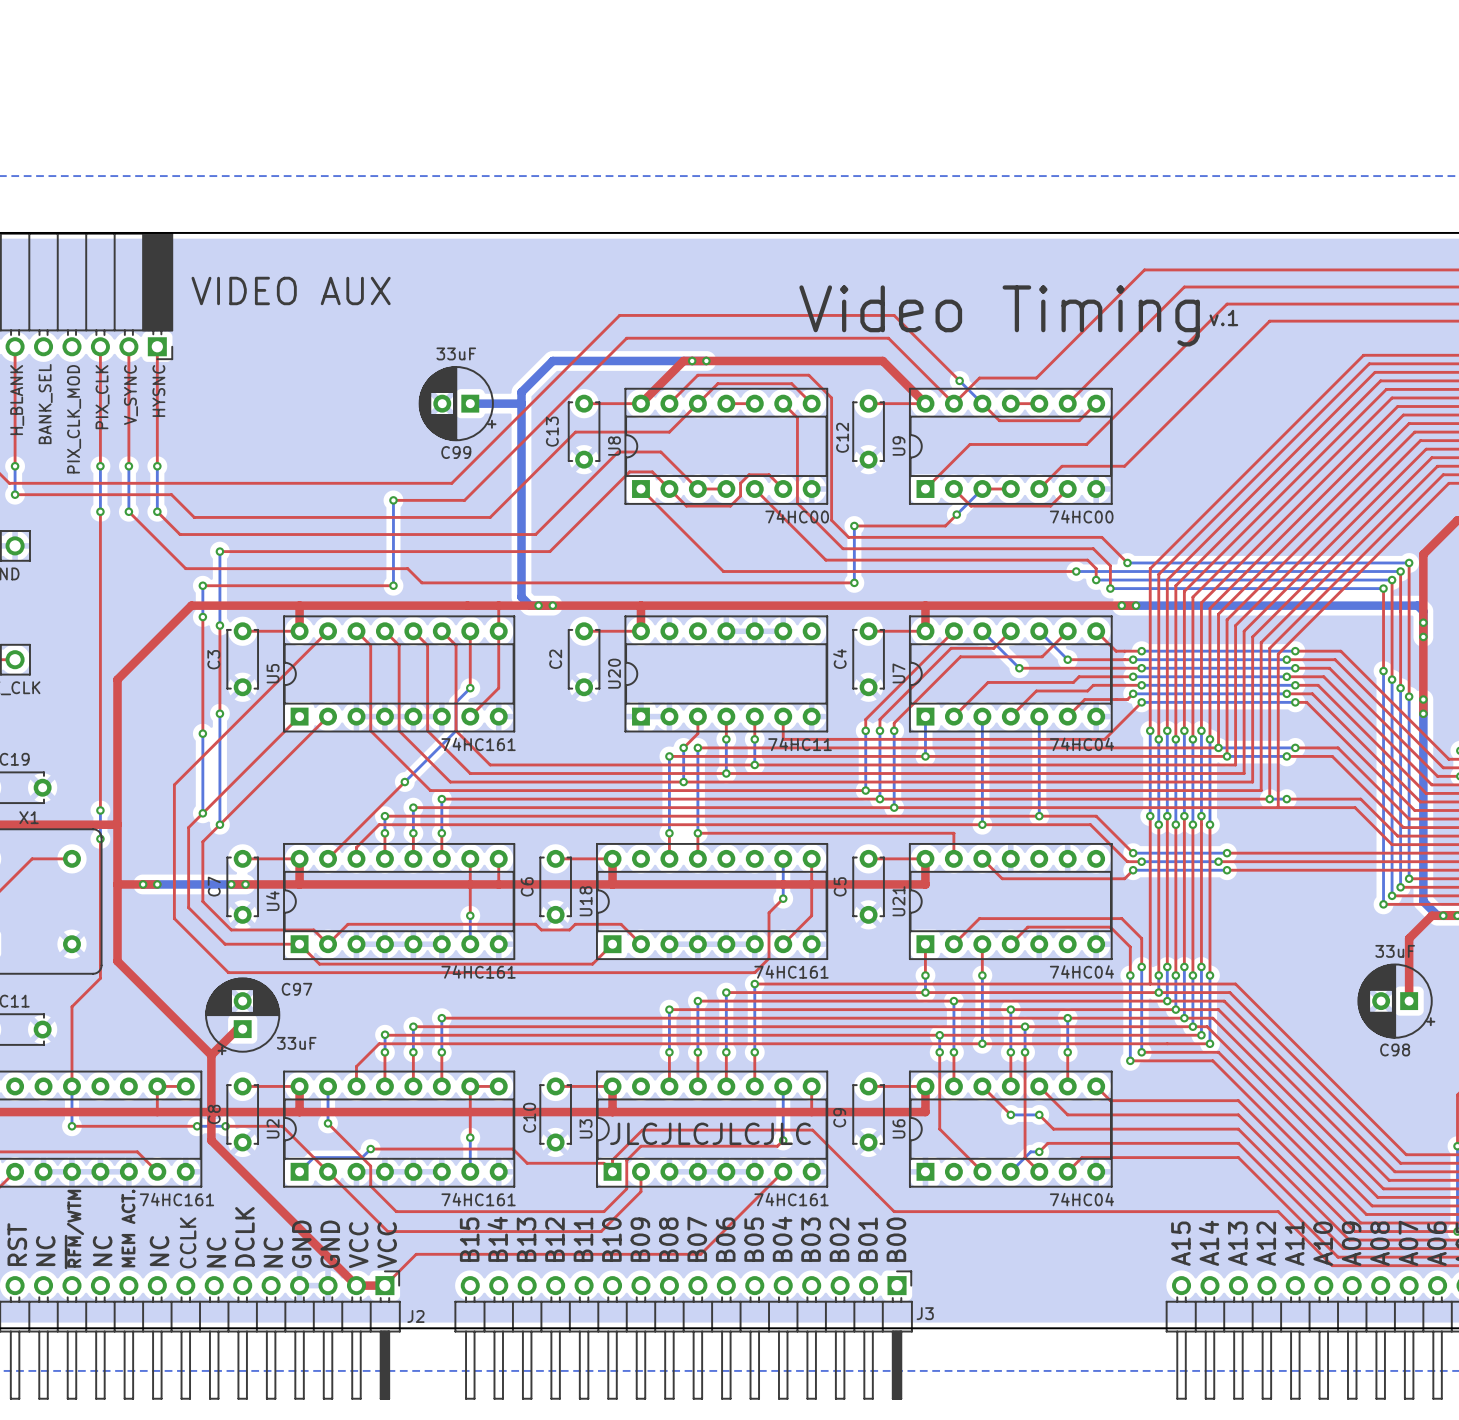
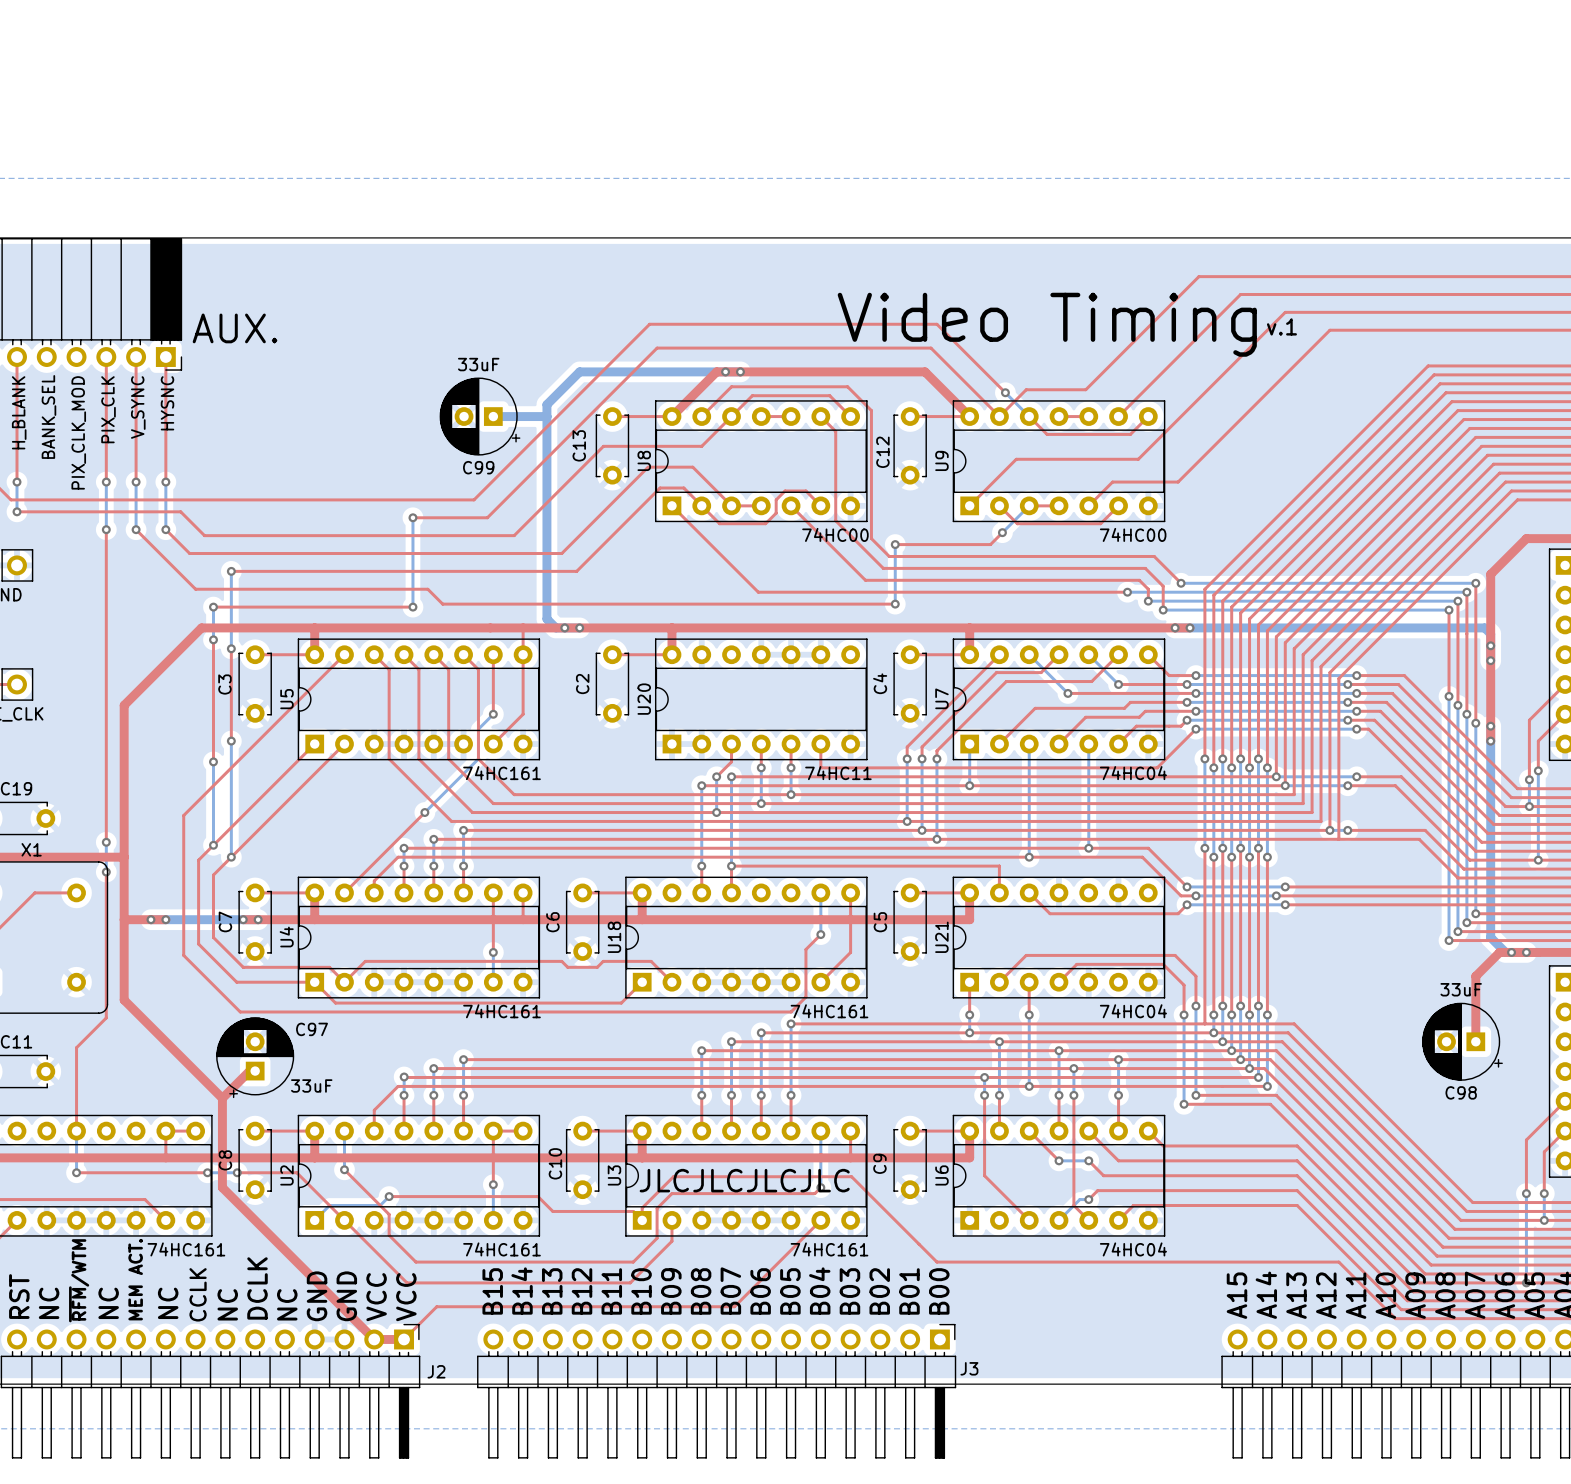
text: VIDEO AUX (291, 290) -> none
text: none -> AUX. (235, 328)

